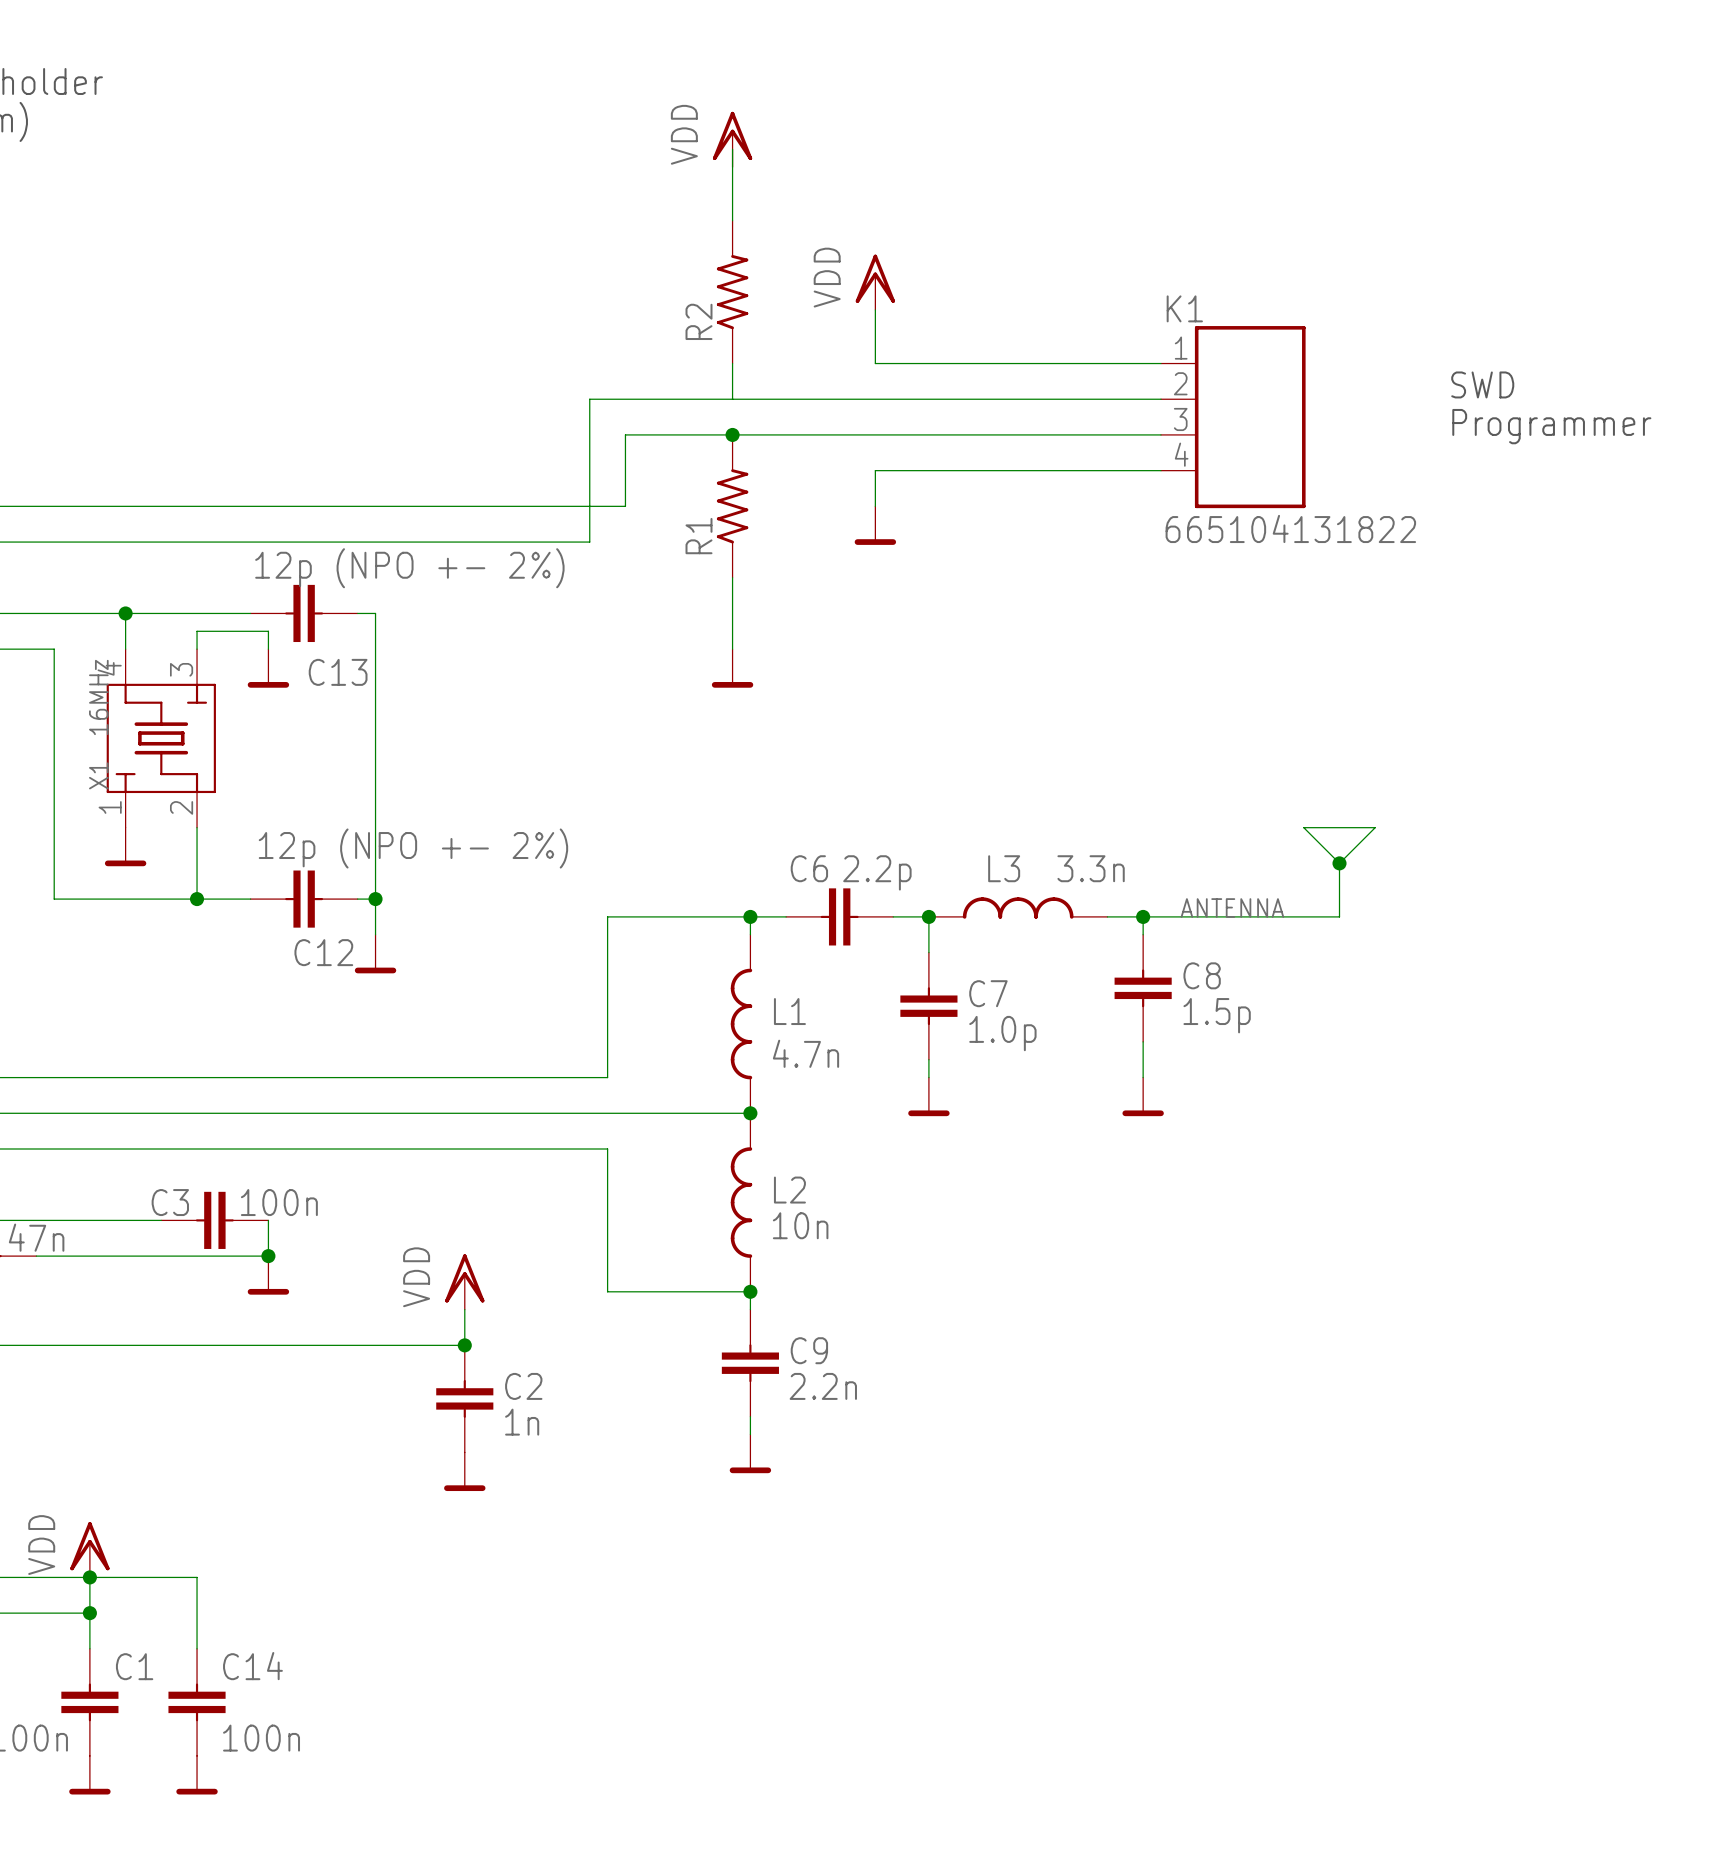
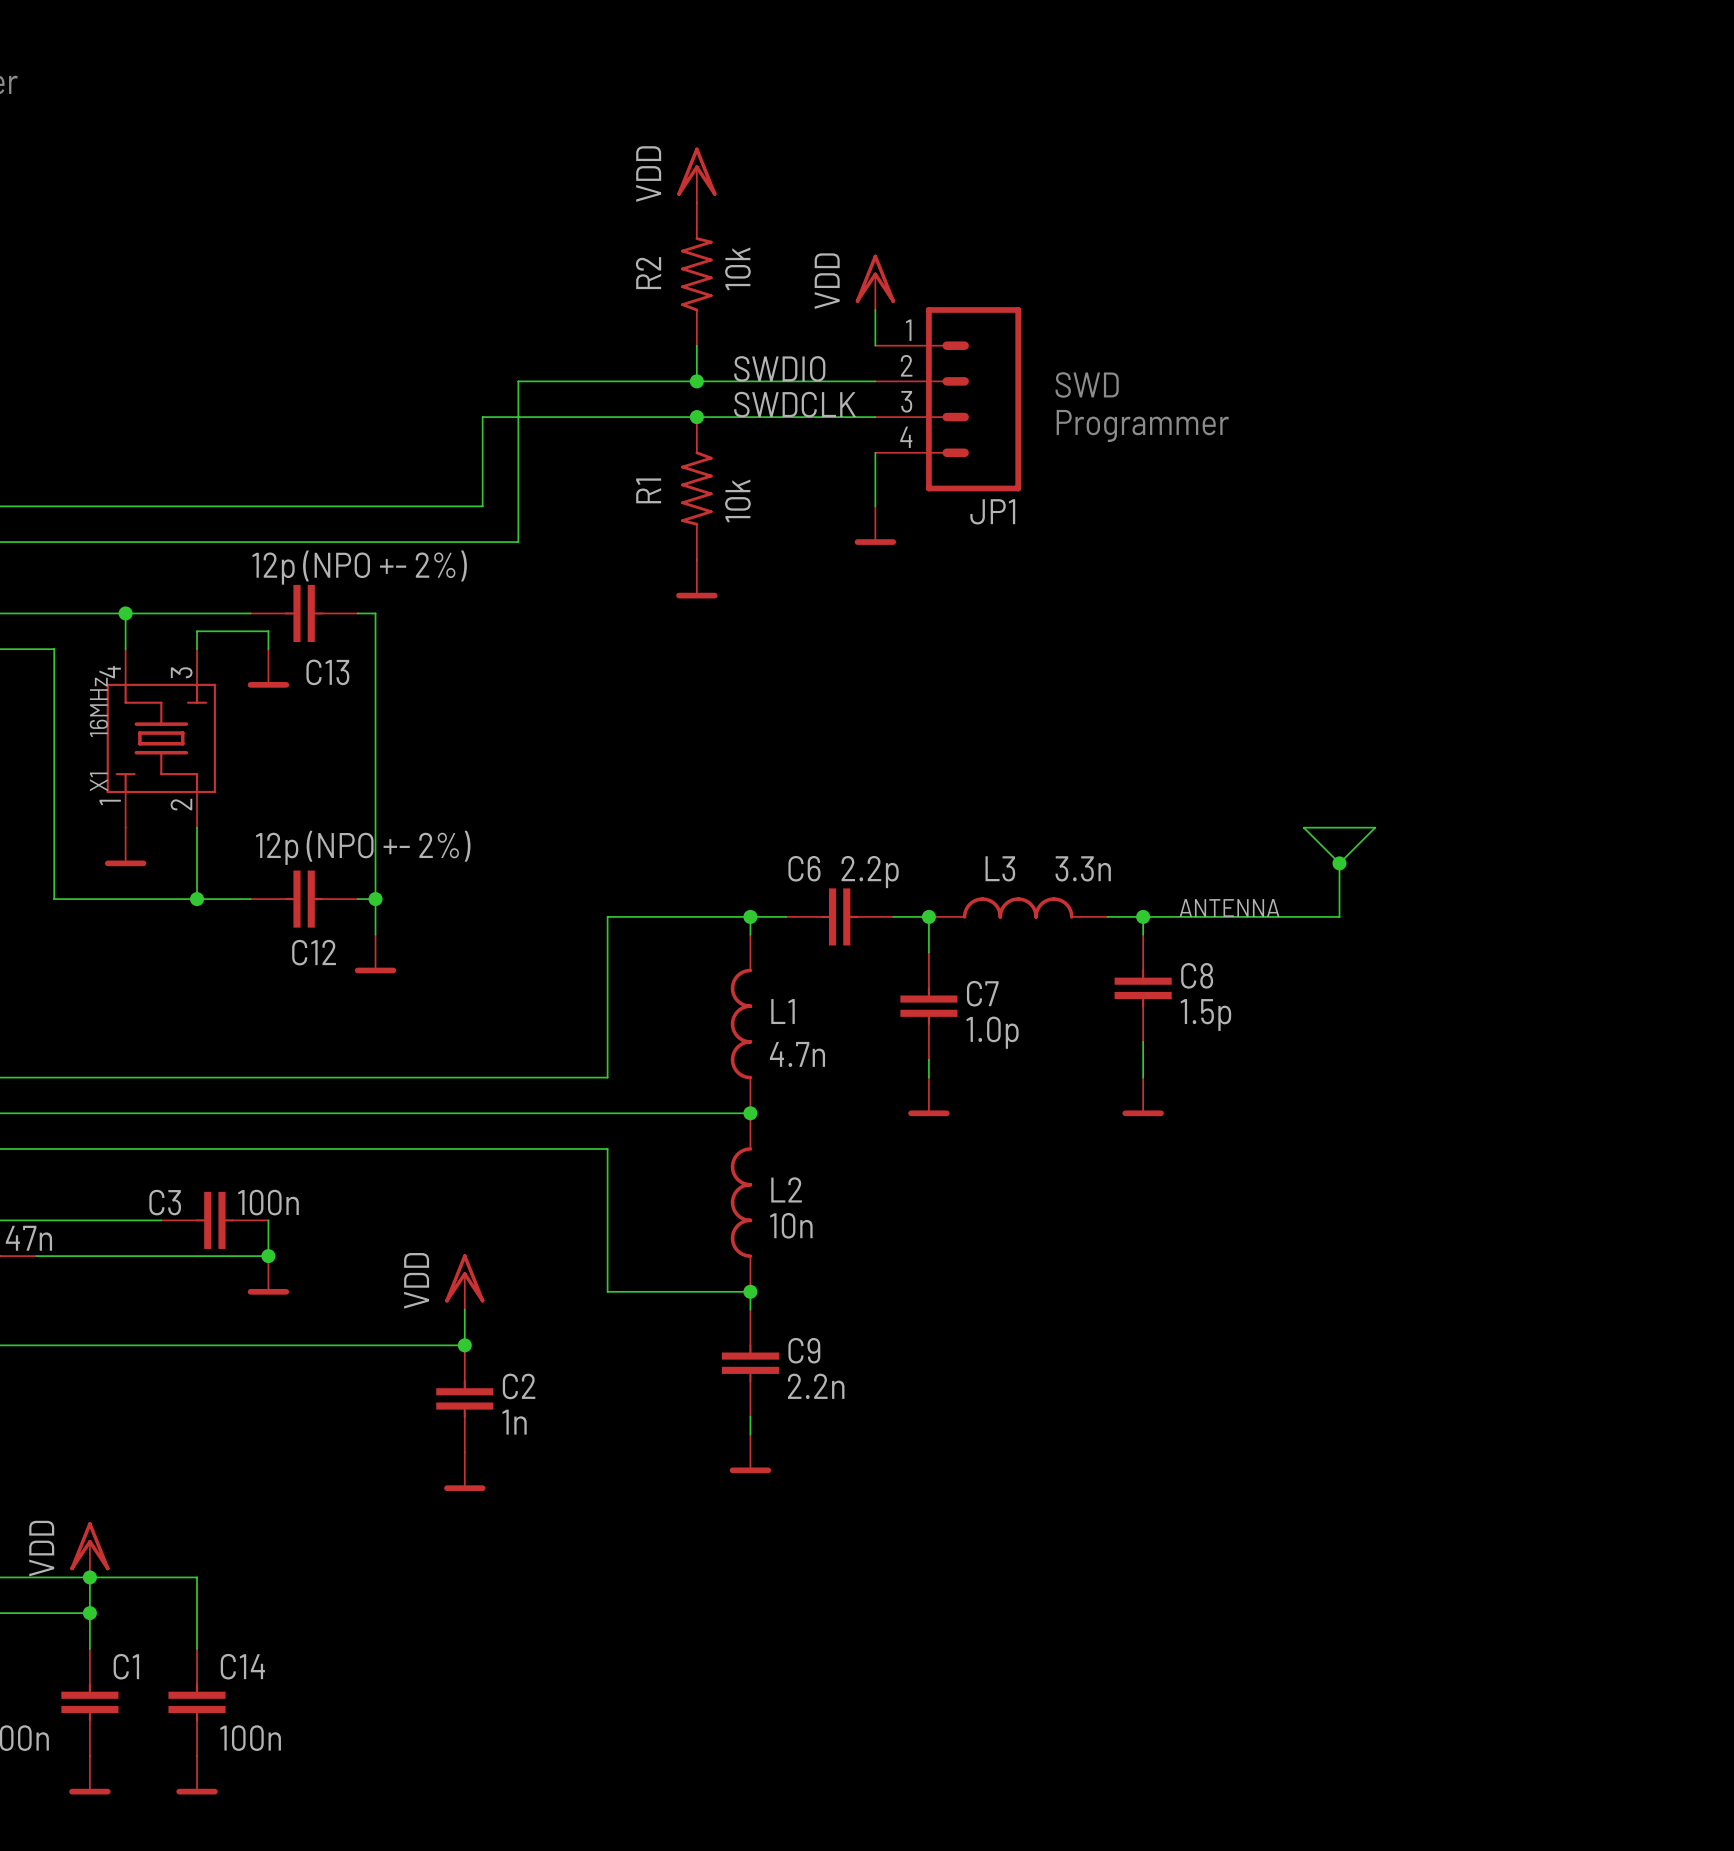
power symbol position: VDD (732, 139) -> VDD (696, 175)
wire: (732, 149) (732, 220) -> none
R2 value: none -> 10k (737, 268)
R2 position: (732, 292) -> (696, 274)
R2 name position: R2 (699, 321) -> R2 (648, 273)
wire: (875, 345) (875, 363) (1160, 363) -> none
wire: (732, 363) (732, 399) -> (696, 345) (696, 381)
label: none -> SWDIO (779, 368)
junction: none -> (696, 381)
text: none -> SWD (1087, 384)
text: SWD (1482, 384) -> none
JP1: none -> (948, 399)
wire: (1160, 399) (589, 399) (589, 542) (518, 542) -> (875, 381) (518, 381) (518, 542)
label: none -> SWDCLK (795, 404)
junction: none -> (696, 417)
K1: 665104131822 (1233, 417) -> none
text: none -> Programmer (1142, 425)
text: Programmer (1551, 426) -> none
junction: (732, 434) -> none
wire: (1160, 434) (625, 434) (625, 506) (482, 506) -> (875, 417) (482, 417) (482, 506)
wire: (875, 470) (1160, 470) -> (875, 470) (875, 452)
R1 value: none -> 10k (737, 501)
R1 rotation: 0° (732, 506) -> 180° (696, 488)
R1 name position: R1 (699, 536) -> R1 (648, 490)
wire: (732, 577) (732, 649) -> none
power symbol position: (732, 668) -> (696, 579)

